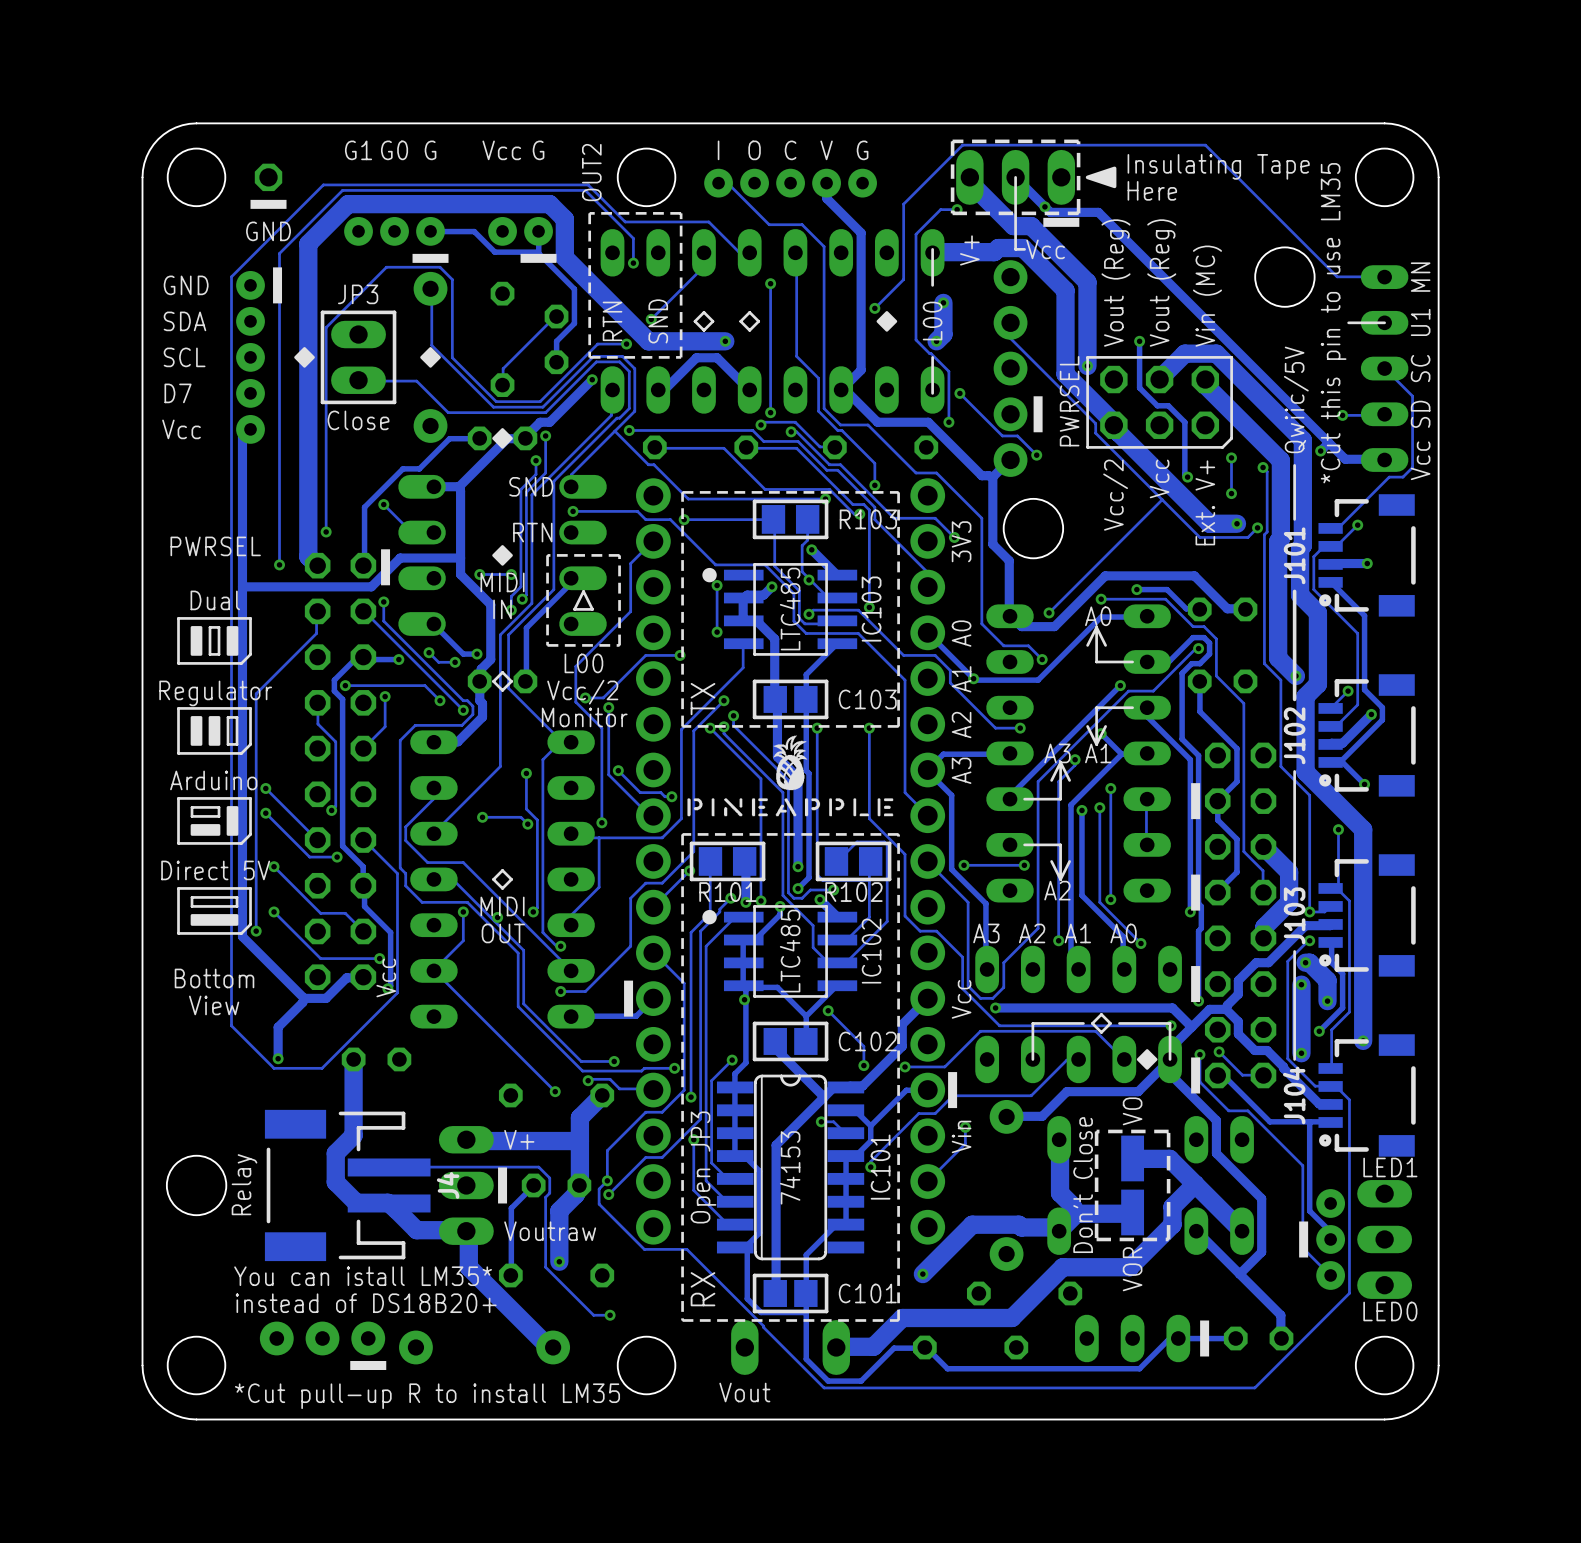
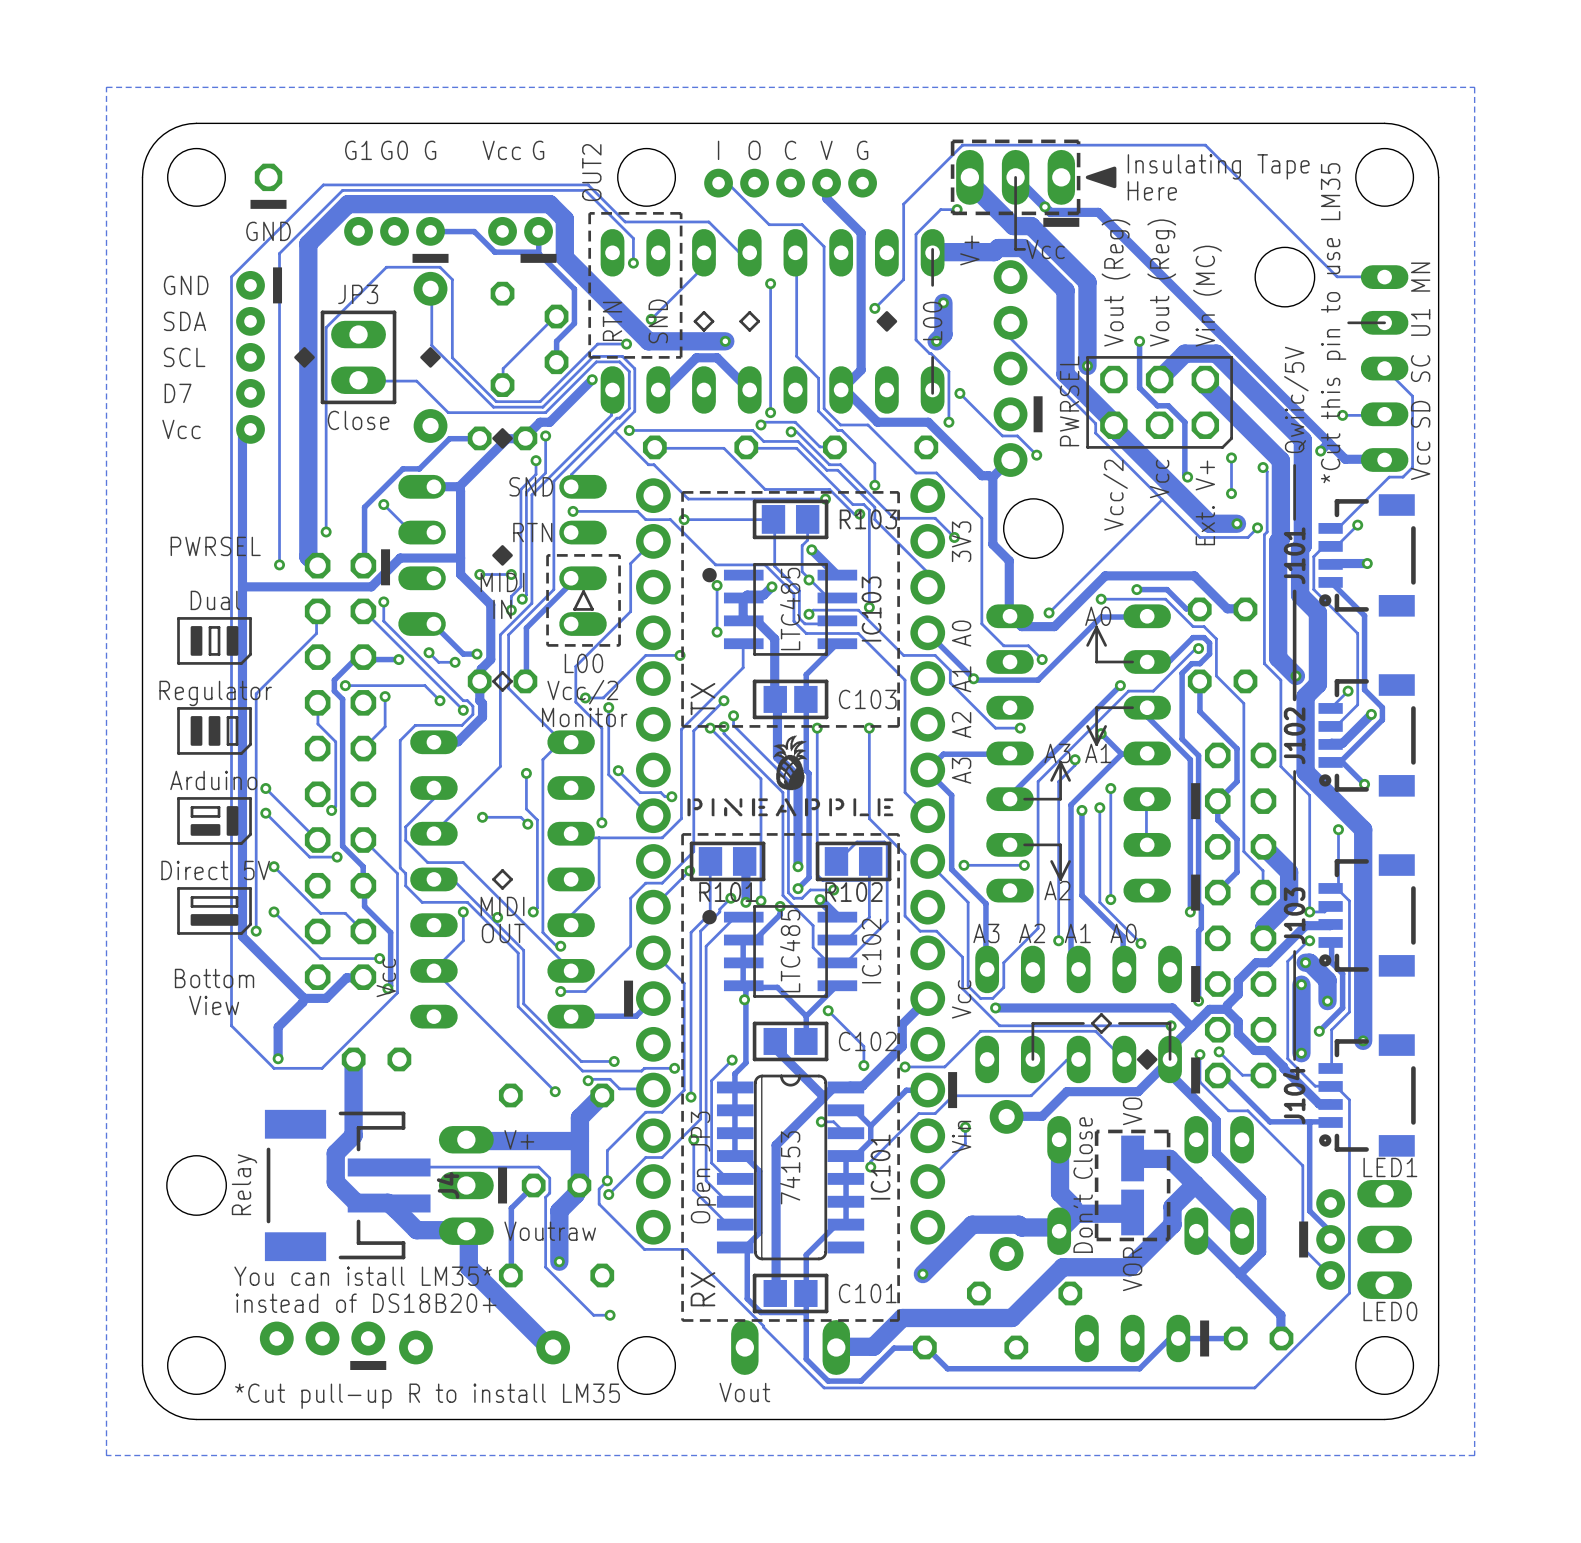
zone outline: none -> (1474, 87) (106, 87) (106, 1455) (1474, 1455) (1474, 87)

